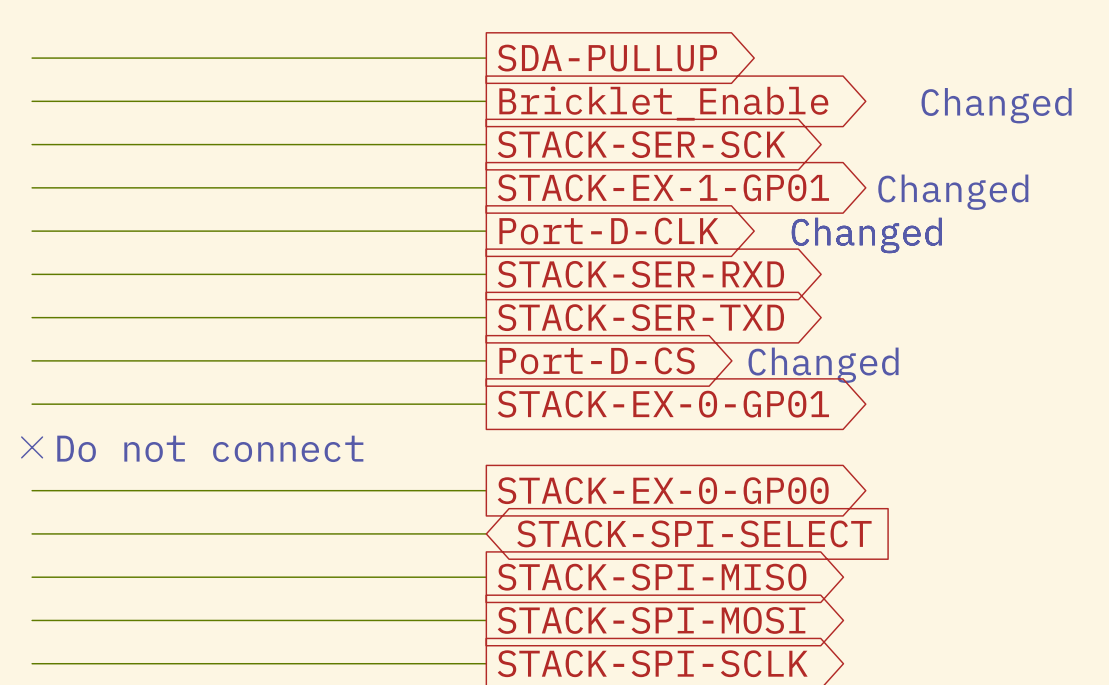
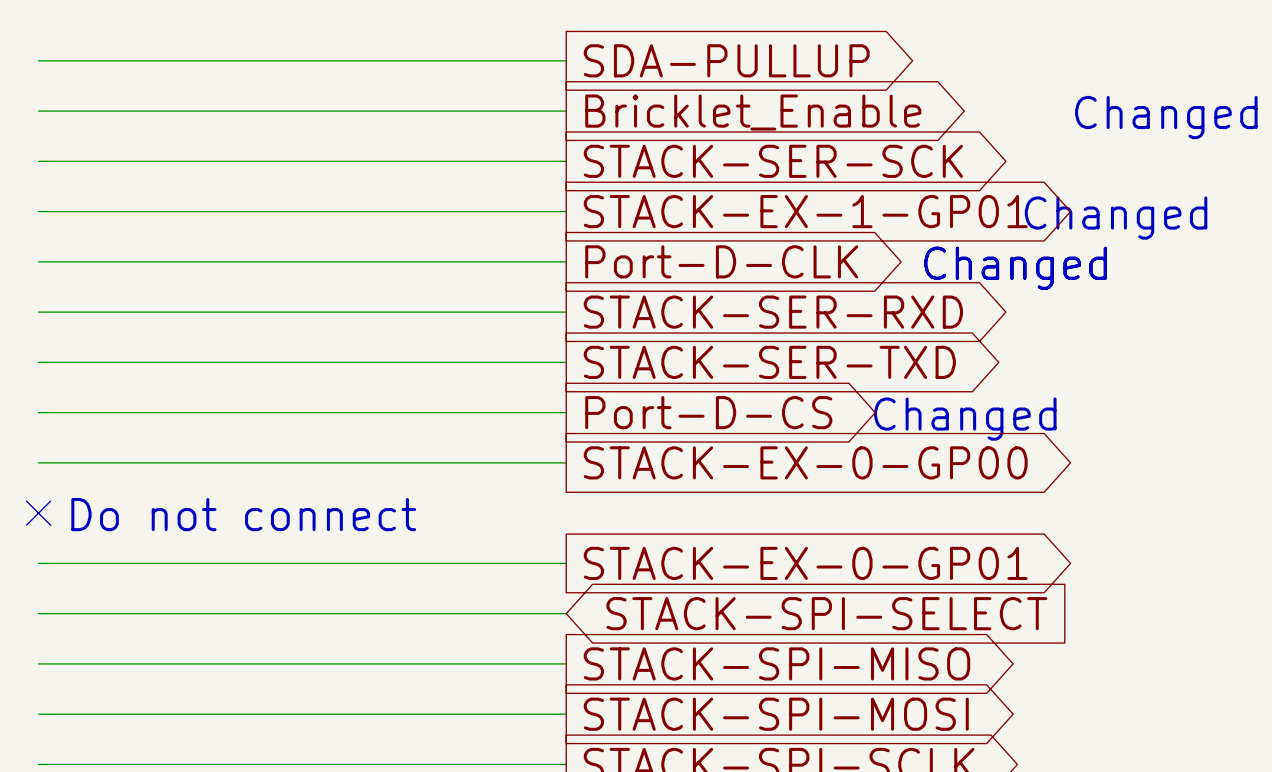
global label: STACK-EX-0-GP01 (663, 404) -> STACK-EX-0-GP00 (805, 462)
global label: STACK-EX-0-GP00 (663, 490) -> STACK-EX-0-GP01 (805, 563)

